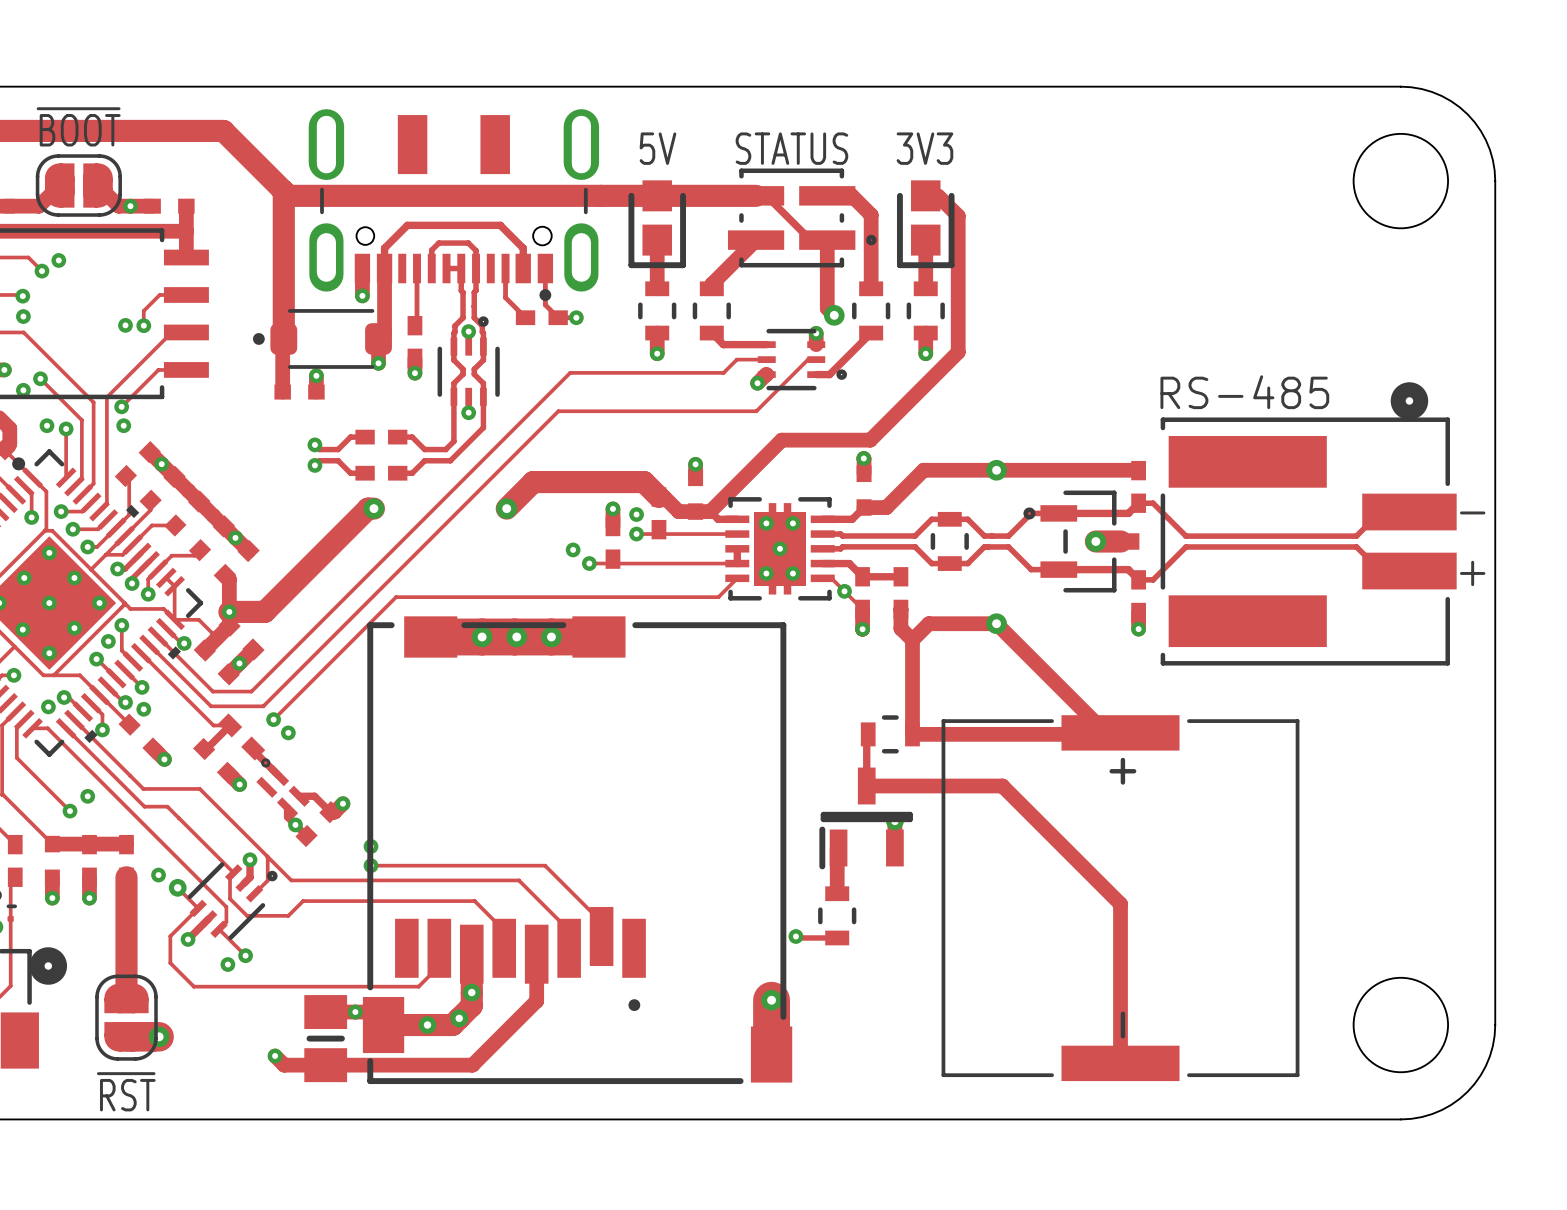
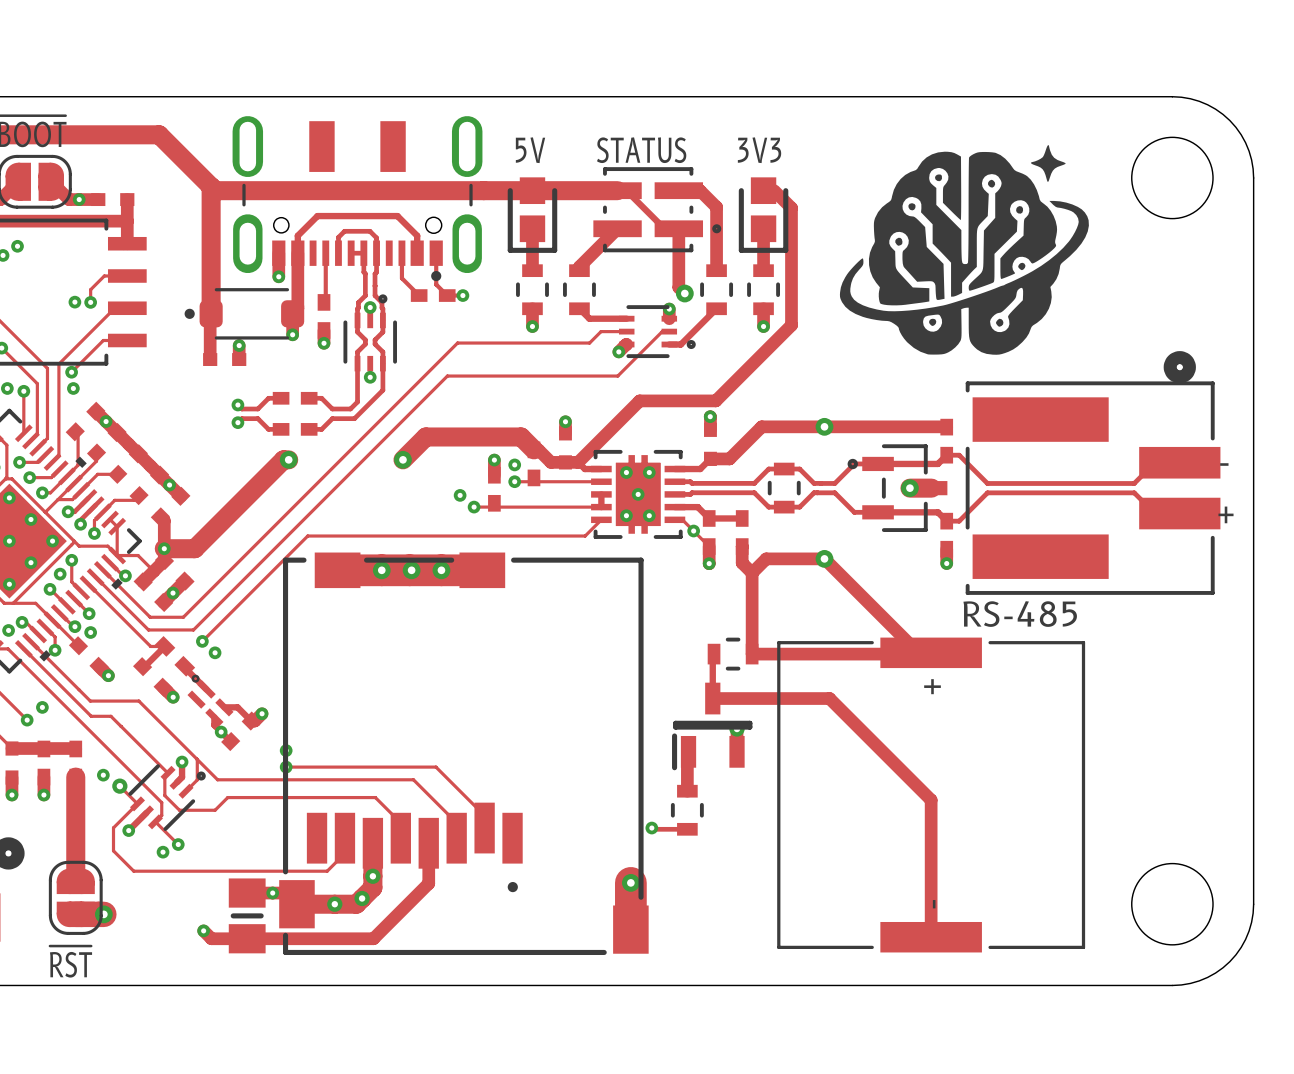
drawing: none -> [839, 145, 1089, 355]
text position: RS-485 (1244, 392) -> RS-485 (1020, 614)

